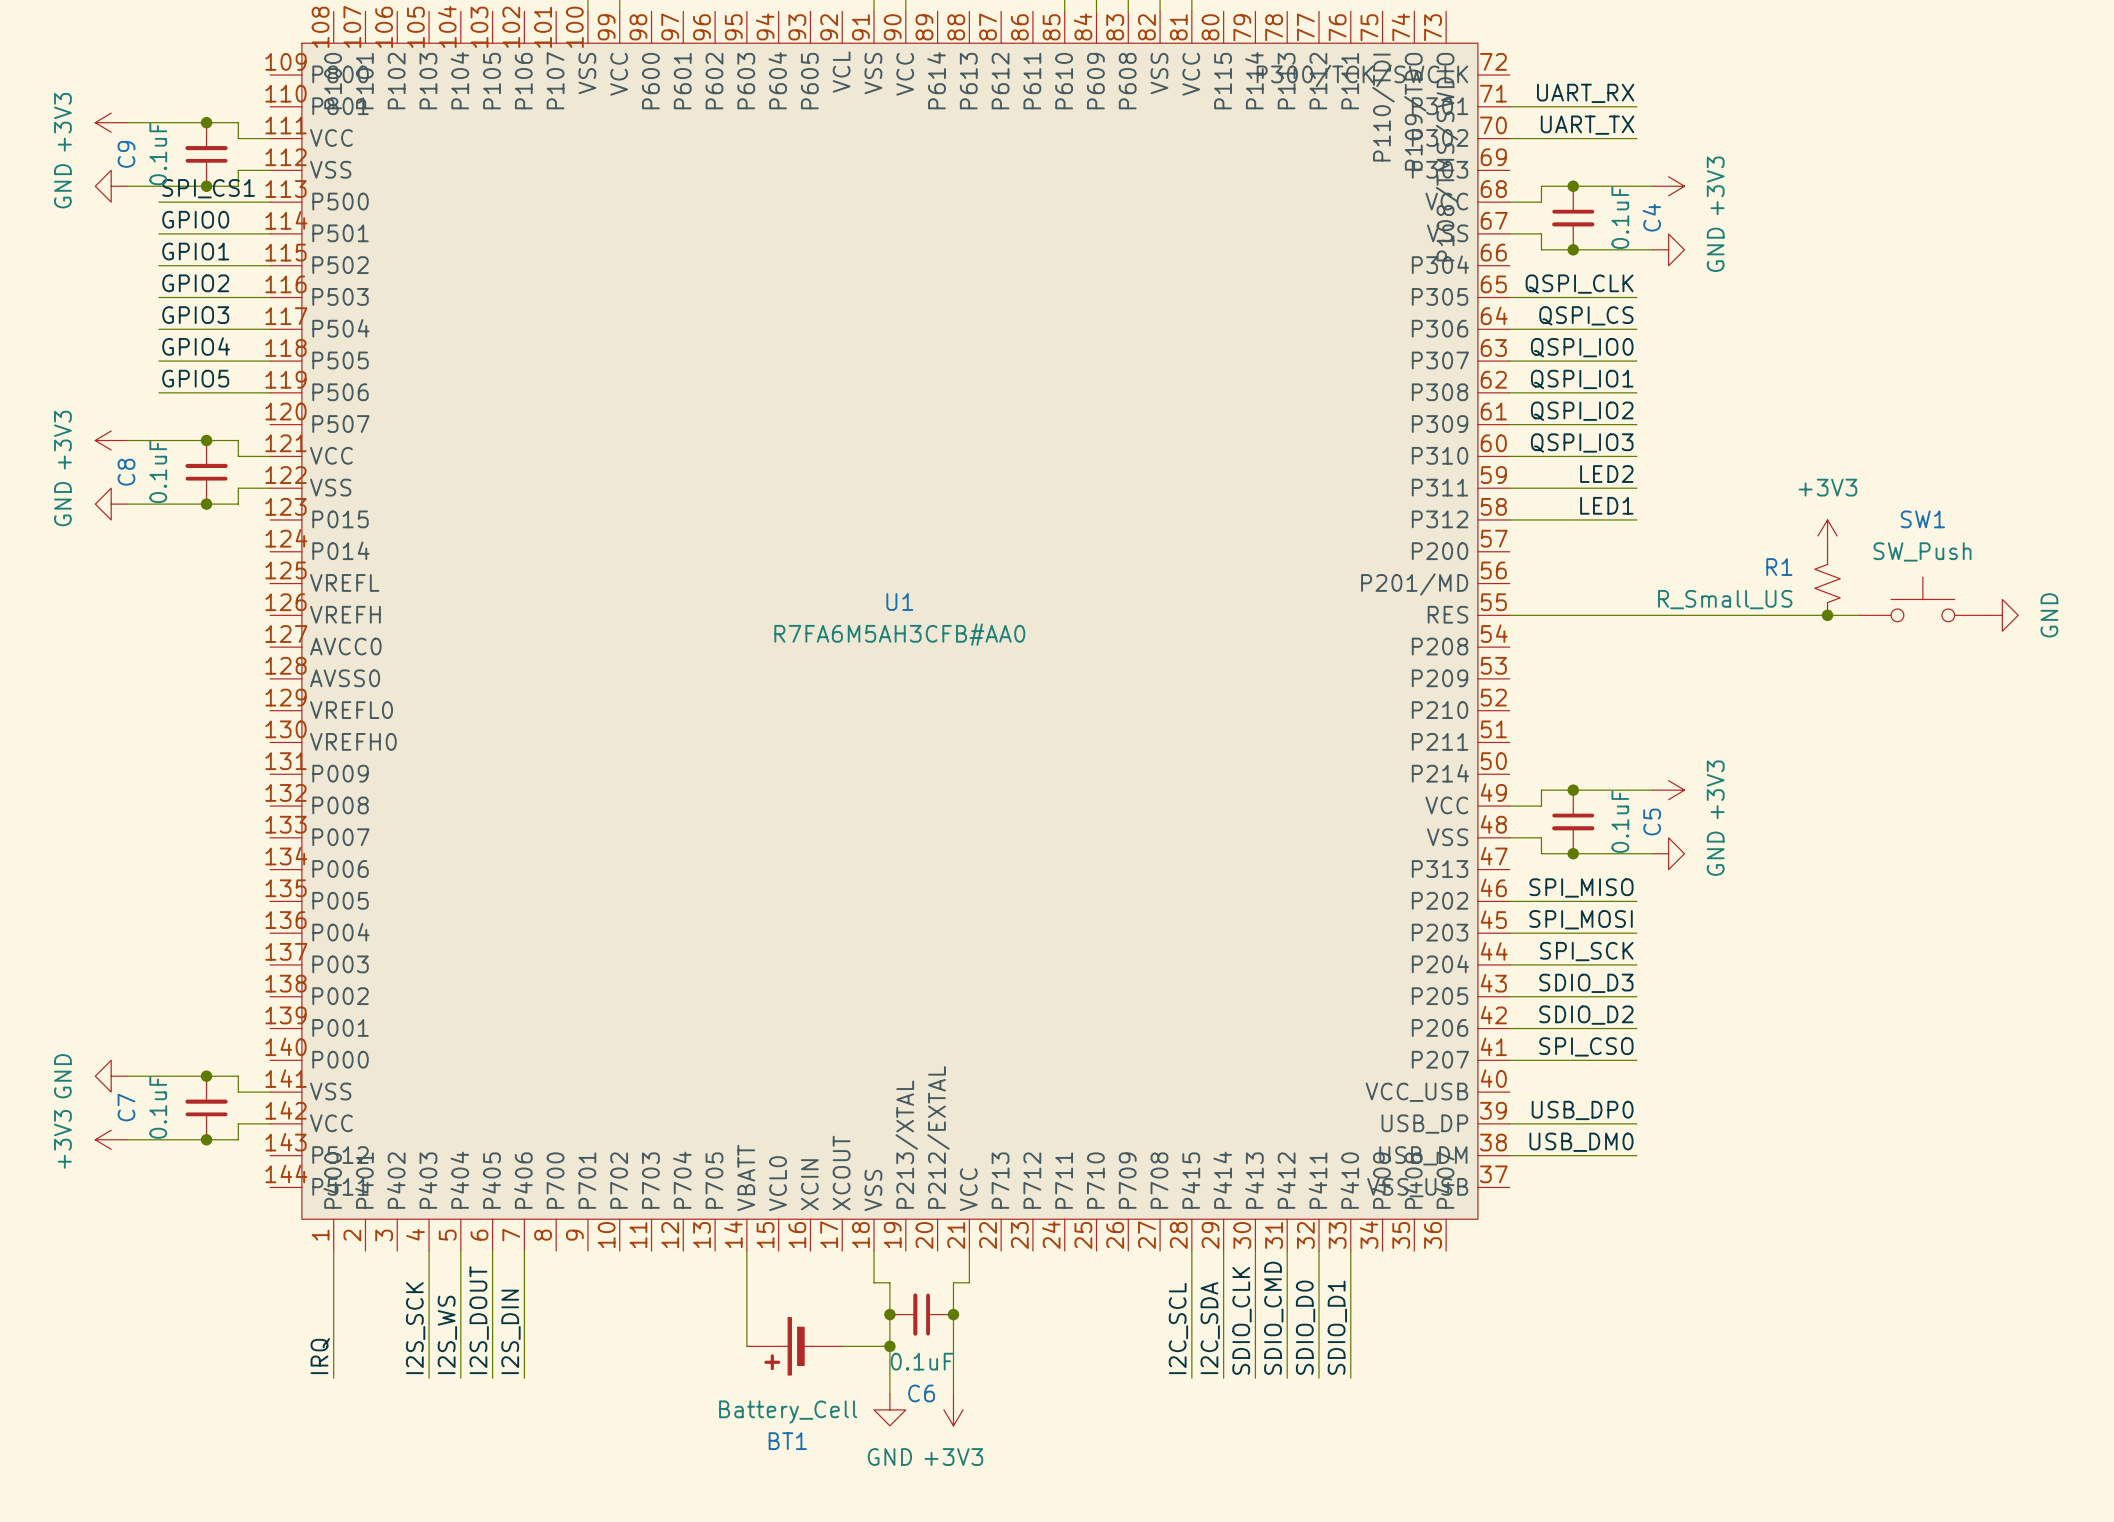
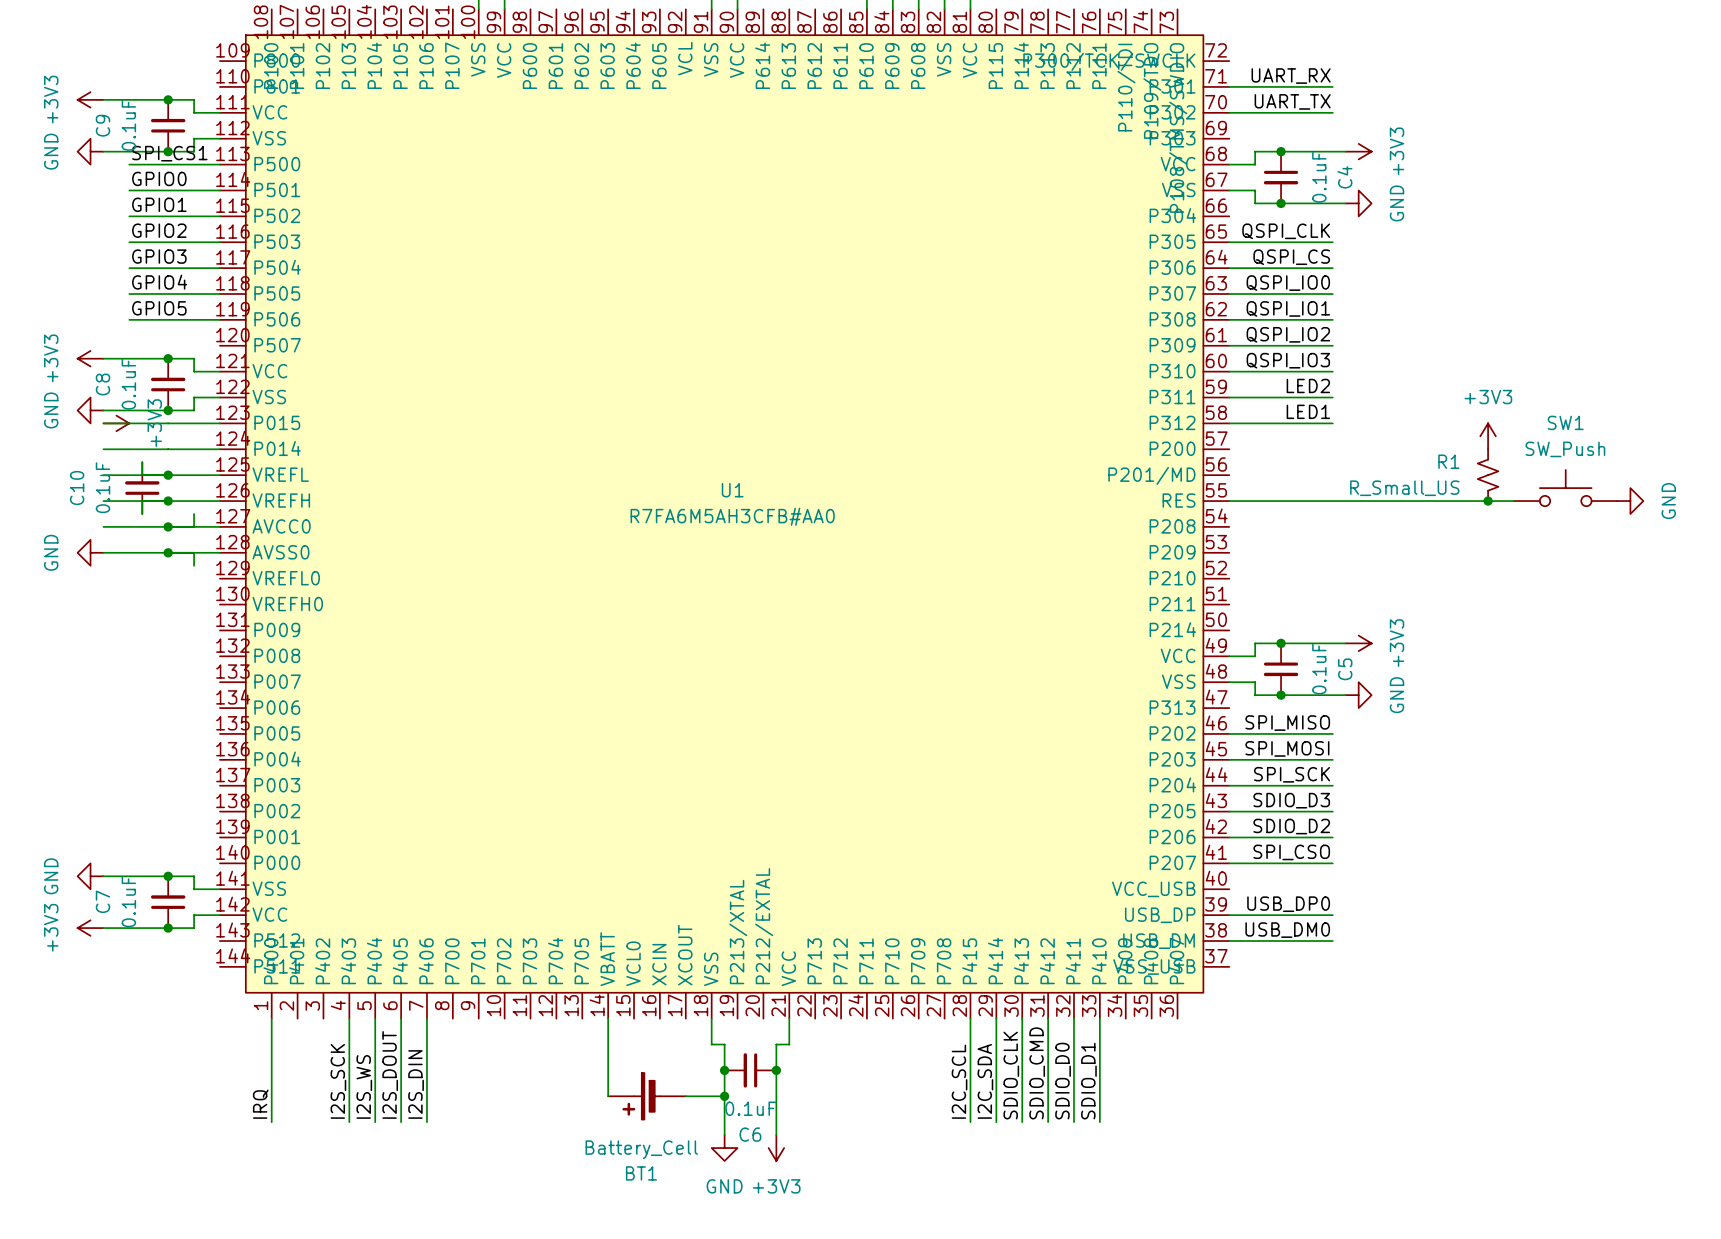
wire: none -> (103, 423) (219, 423)
power symbol: none -> +3V3 (116, 423)
wire: none -> (103, 449) (219, 449)
wire: none -> (142, 462) (142, 475)
wire: none -> (103, 475) (219, 475)
junction: none -> (168, 475)
C10: none -> 0.1uF (142, 488)
wire: none -> (103, 501) (219, 501)
wire: none -> (142, 501) (142, 513)
junction: none -> (168, 501)
wire: none -> (194, 513) (194, 526)
wire: none -> (103, 526) (219, 526)
junction: none -> (168, 526)
power symbol: none -> GND (90, 552)
wire: none -> (103, 552) (219, 552)
junction: none -> (168, 552)
wire: none -> (194, 552) (194, 565)

